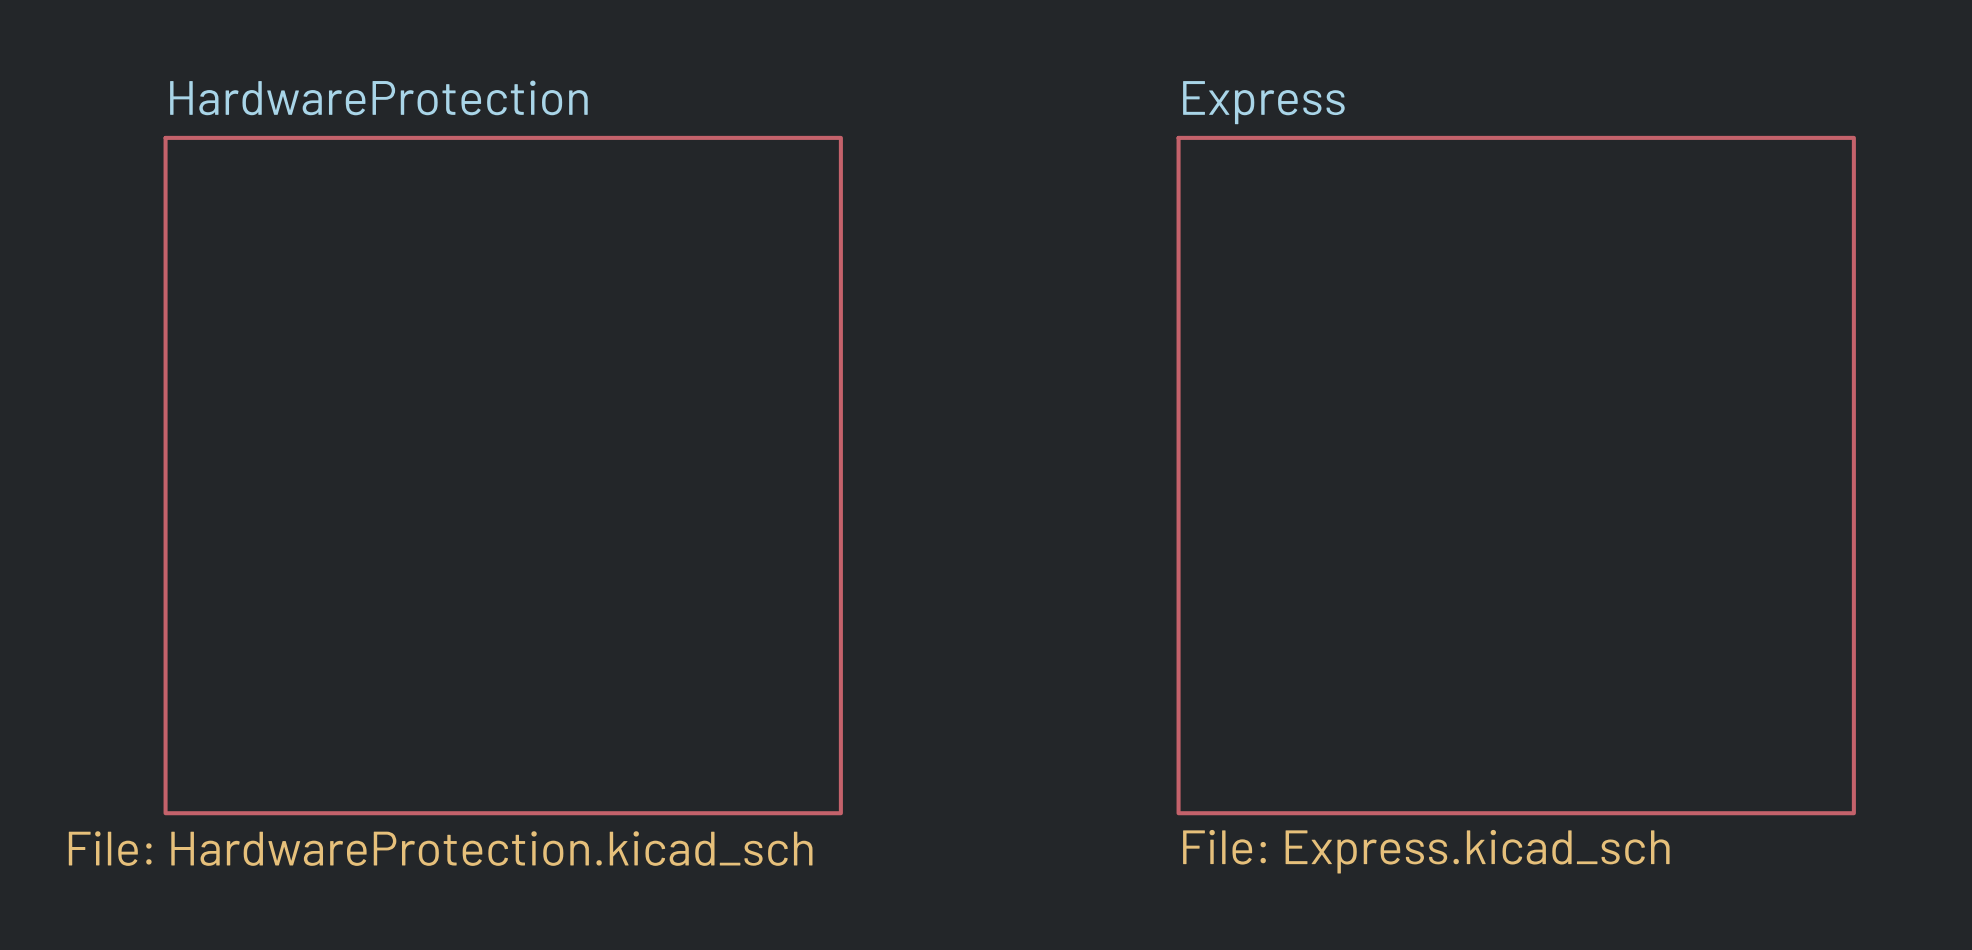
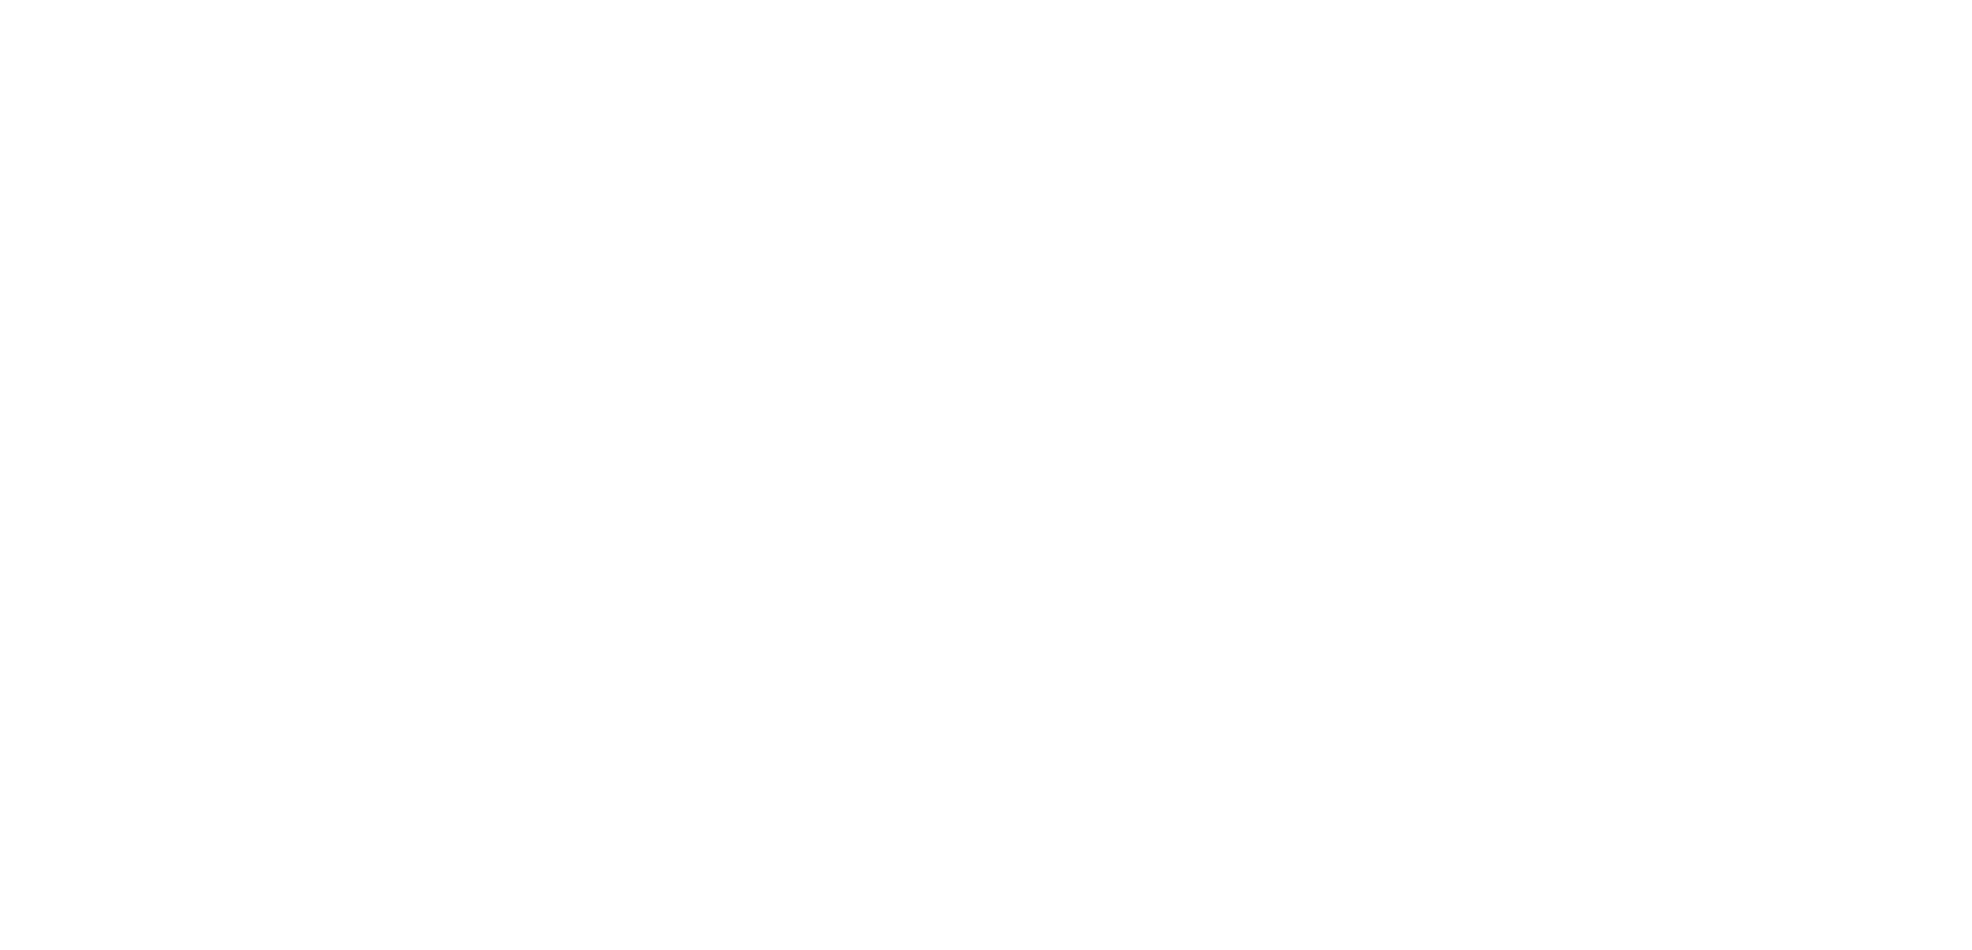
sheet HardwareProtection: File: HardwareProtection.kicad_sch (503, 475) -> none
sheet Express: File: Express.kicad_sch (1516, 475) -> none

